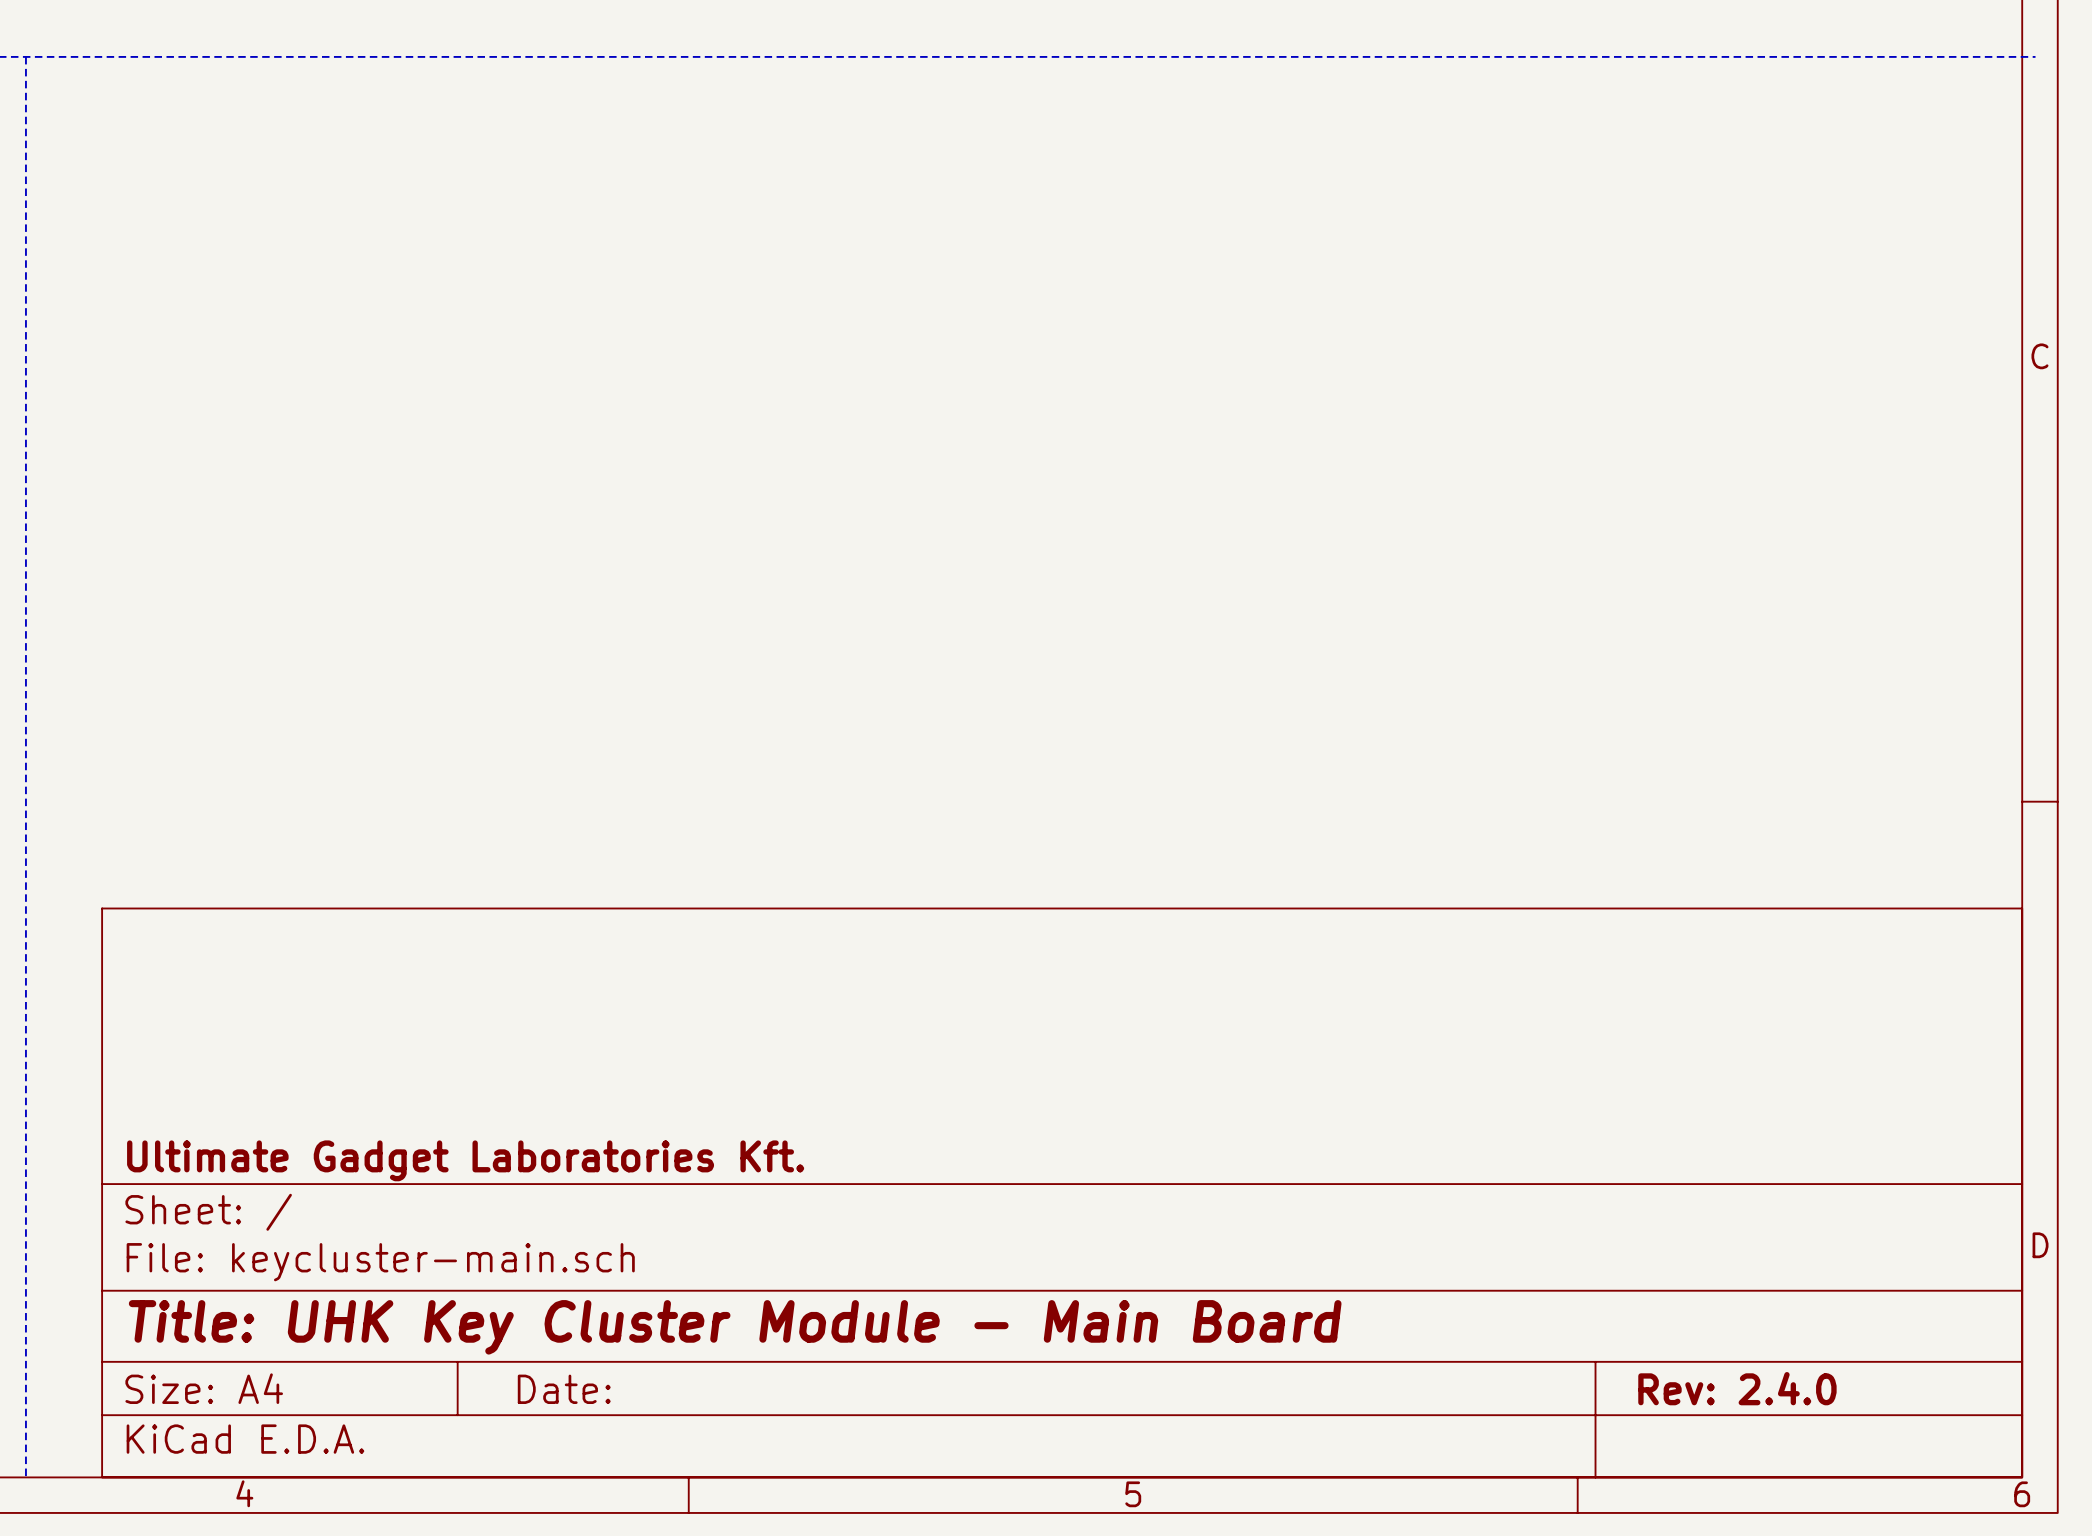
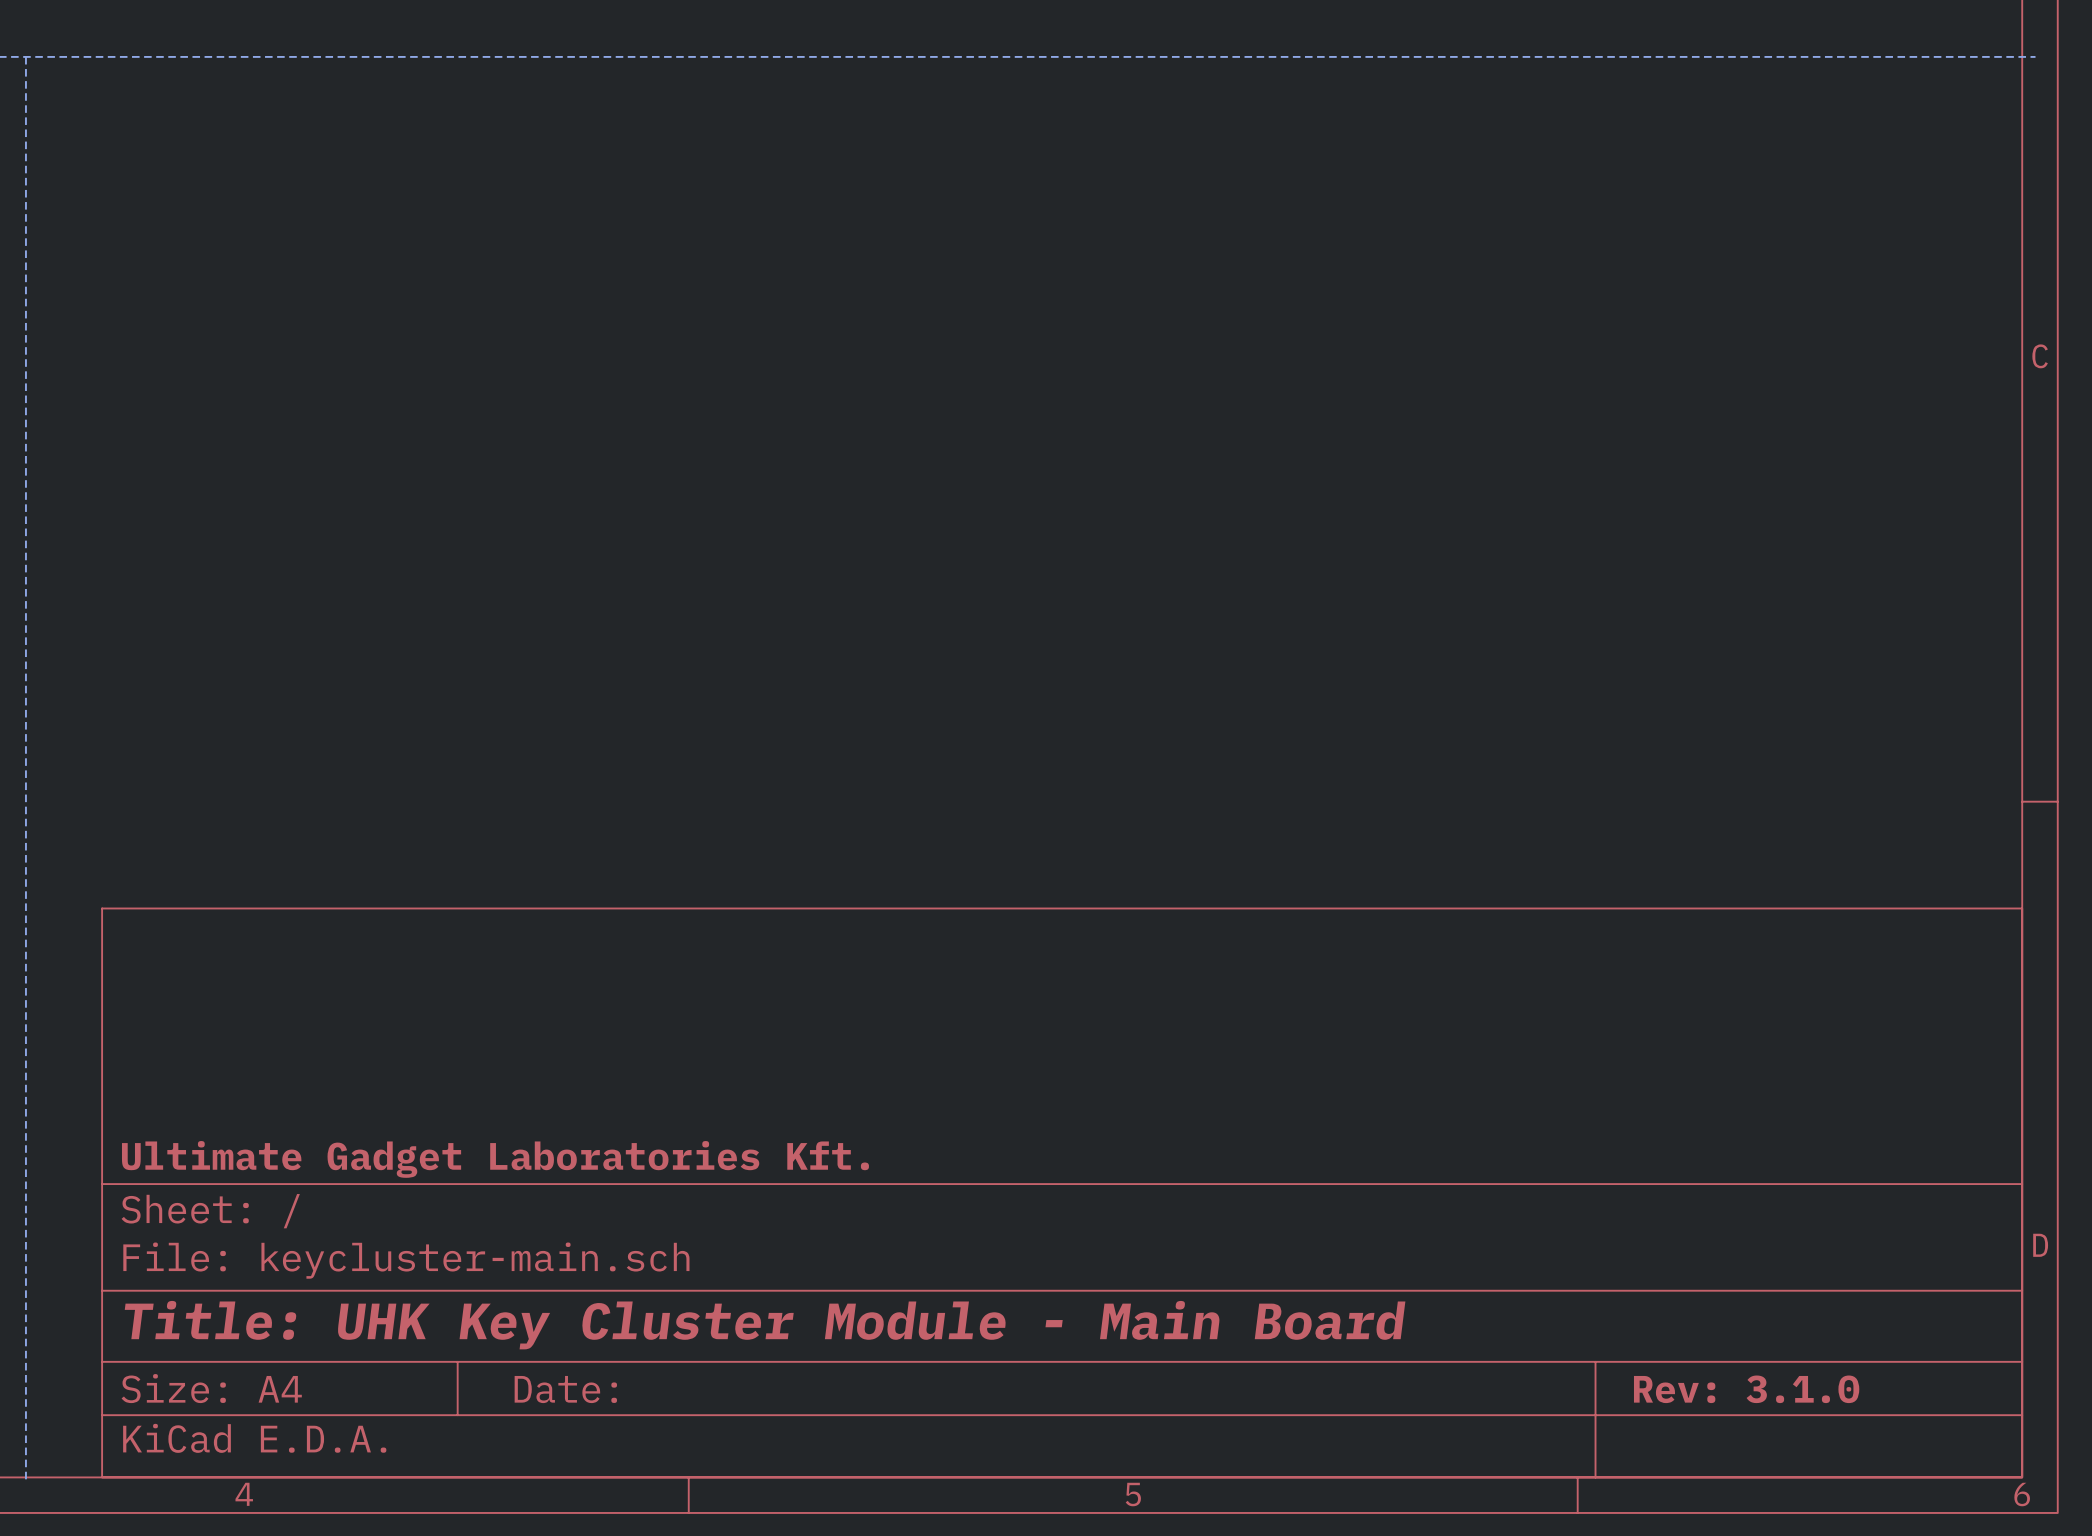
title block: Rev: 2.4.0 (1737, 1388) -> Rev: 3.1.0 (1746, 1389)

